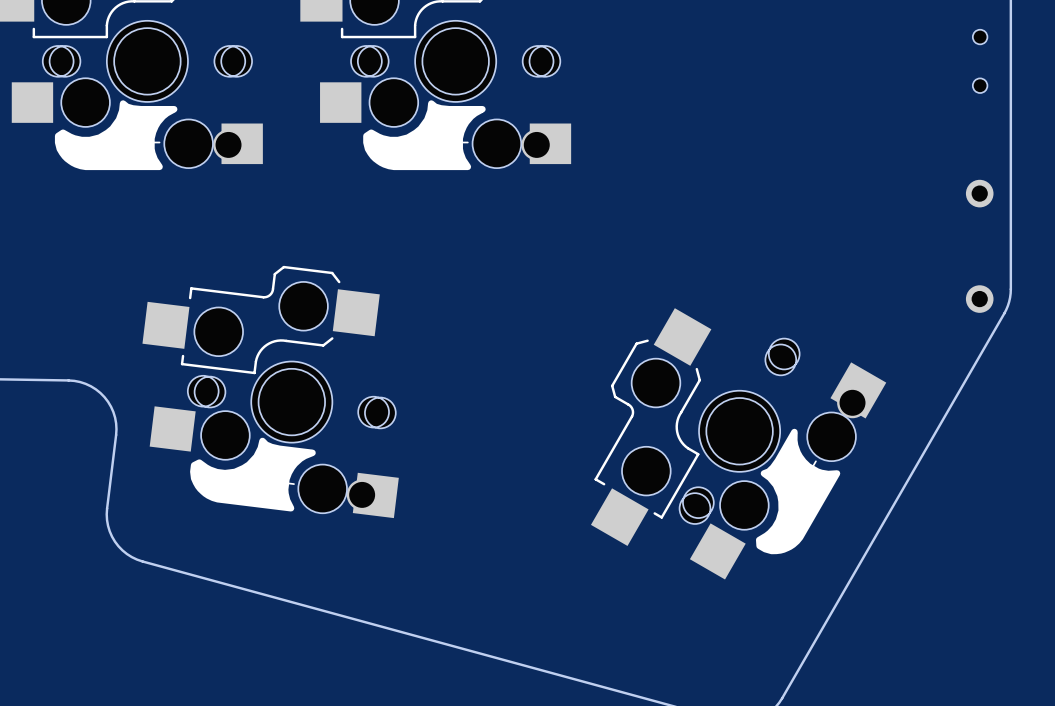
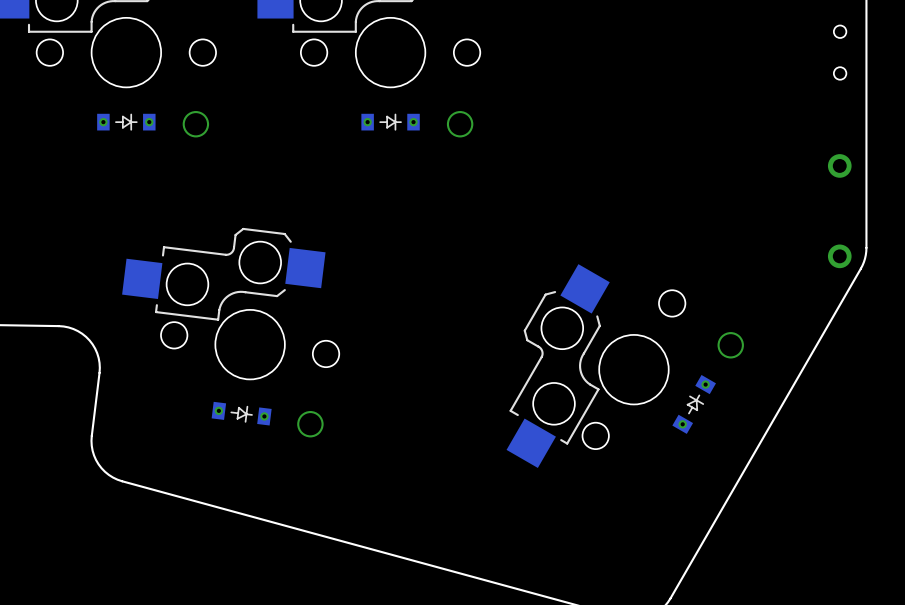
part: (137, 99) -> none
part: (445, 99) -> none
part: (274, 443) -> none
part: (784, 461) -> none

